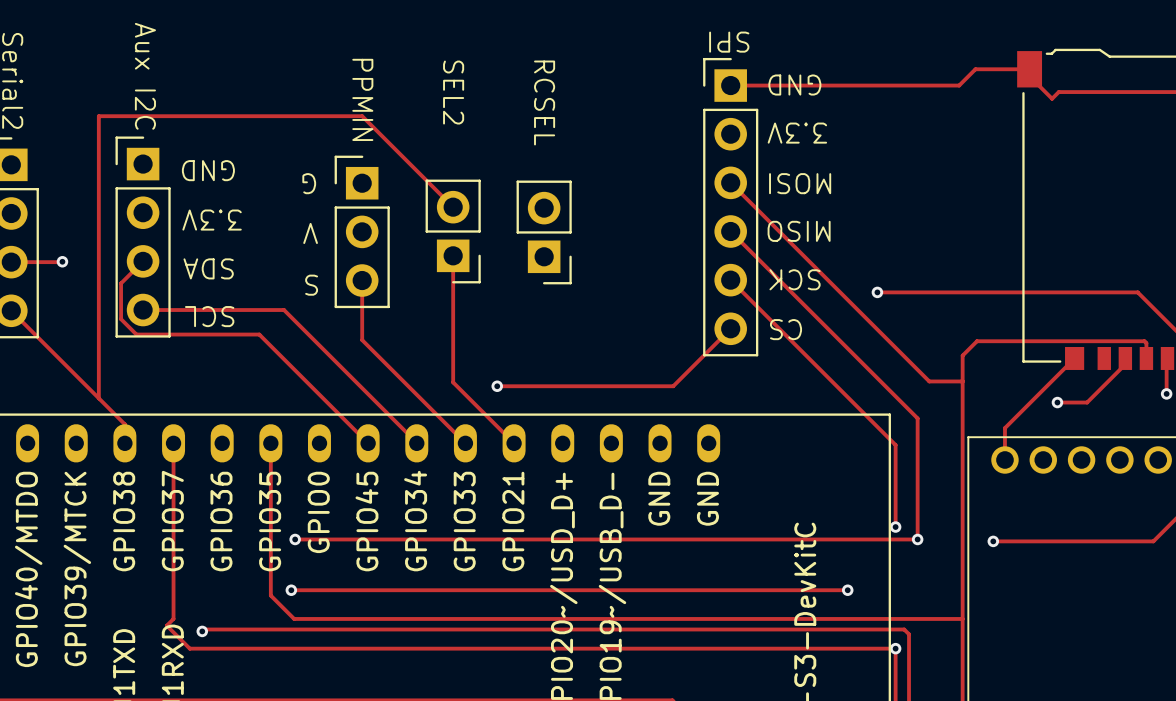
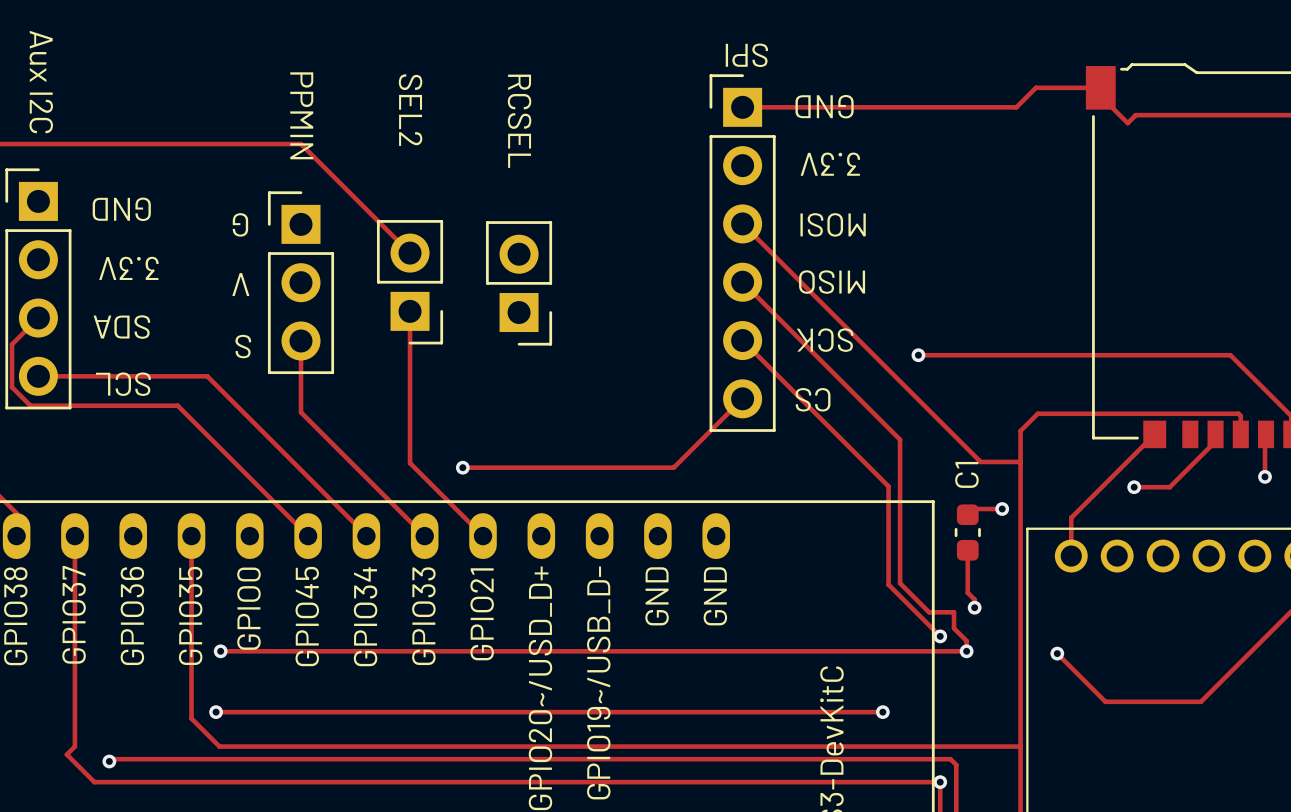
track: (862, 362) (917, 418) (917, 530) -> (900, 439) (900, 583) (929, 612) (954, 612) (954, 628) (966, 640)
track: (852, 401) (895, 445) (895, 527) -> (888, 486) (888, 584) (940, 636)
track: none -> (1002, 509) (973, 509) (967, 514)
via: none -> (1002, 509)
C1: none -> (967, 532)
track: none -> (967, 550) (967, 592) (974, 599) (974, 607)
via: none -> (974, 607)
track: (993, 541) (1153, 541) -> (1057, 653) (1105, 701) (1200, 701) (1249, 653)

